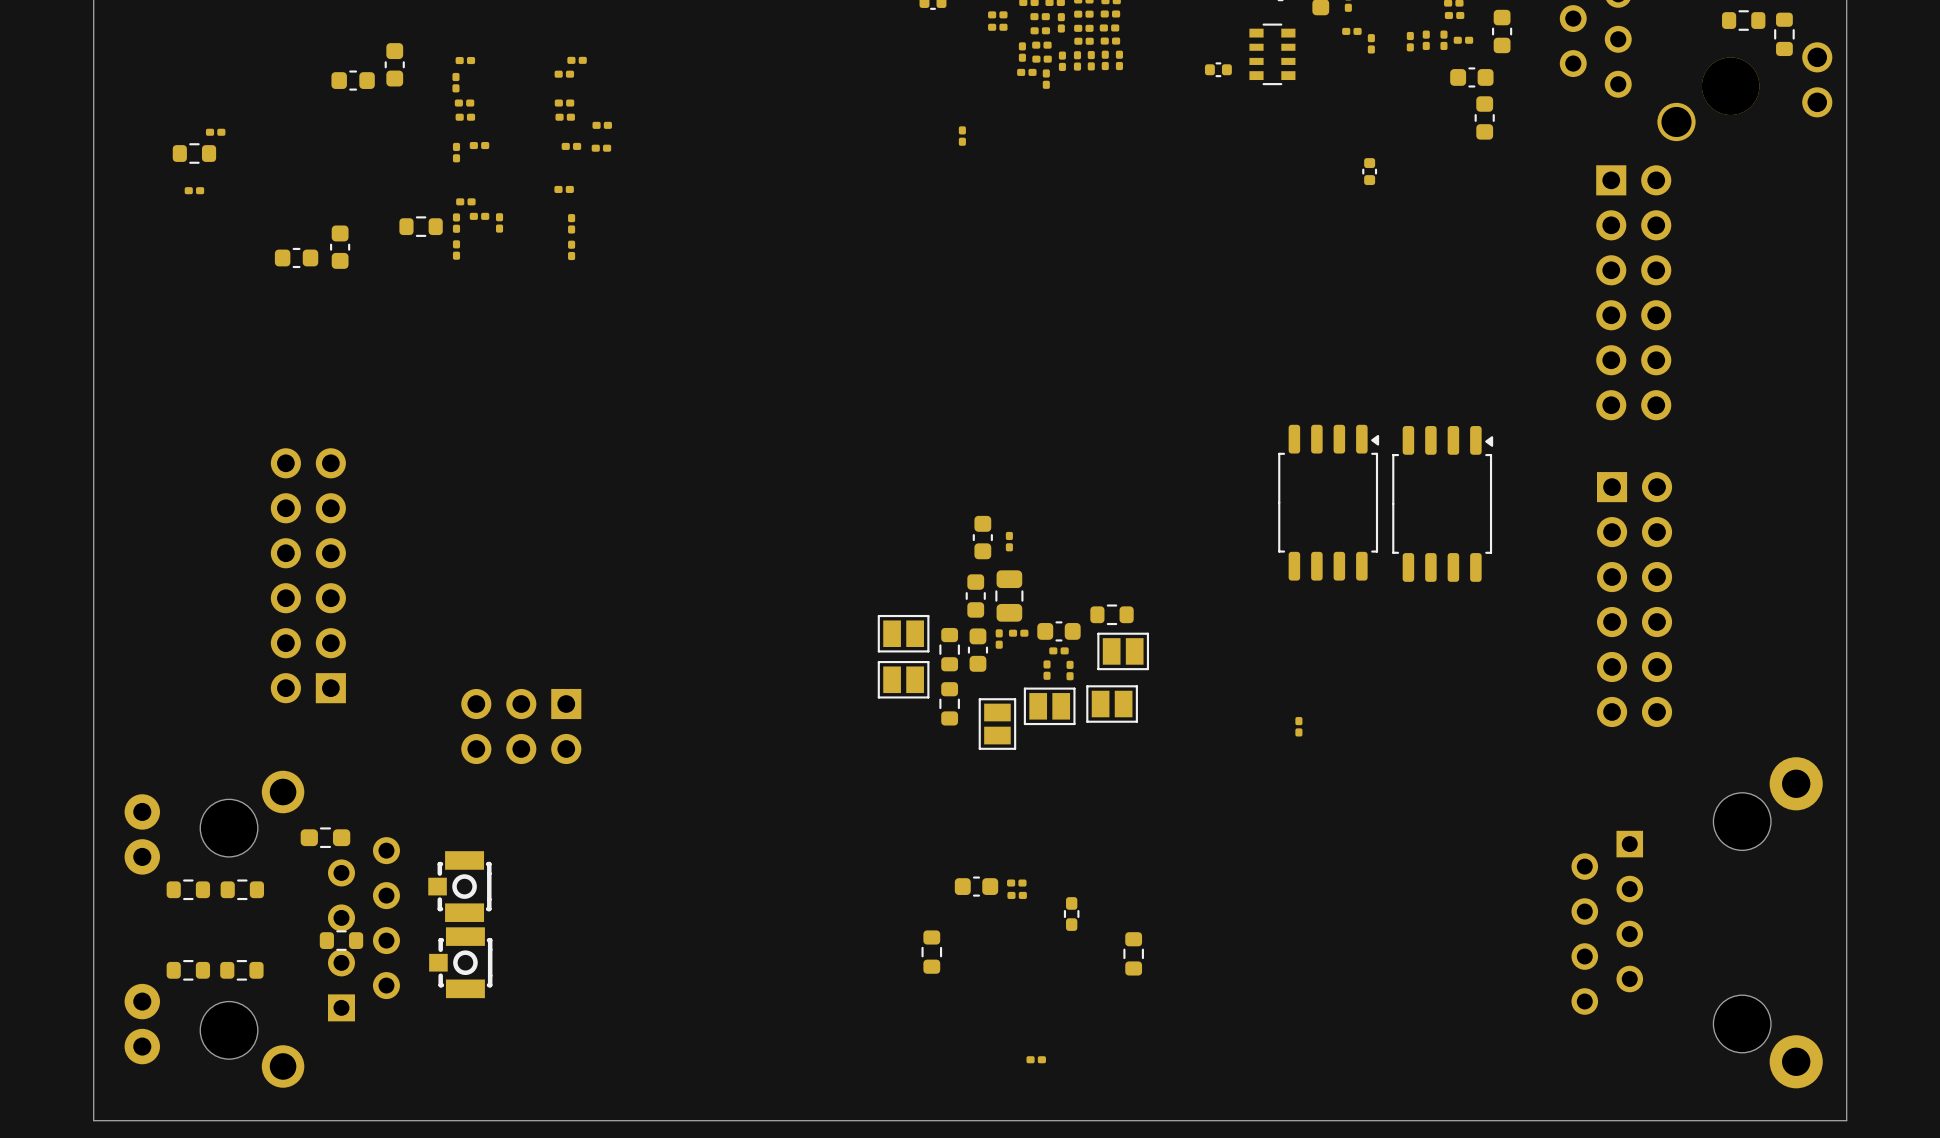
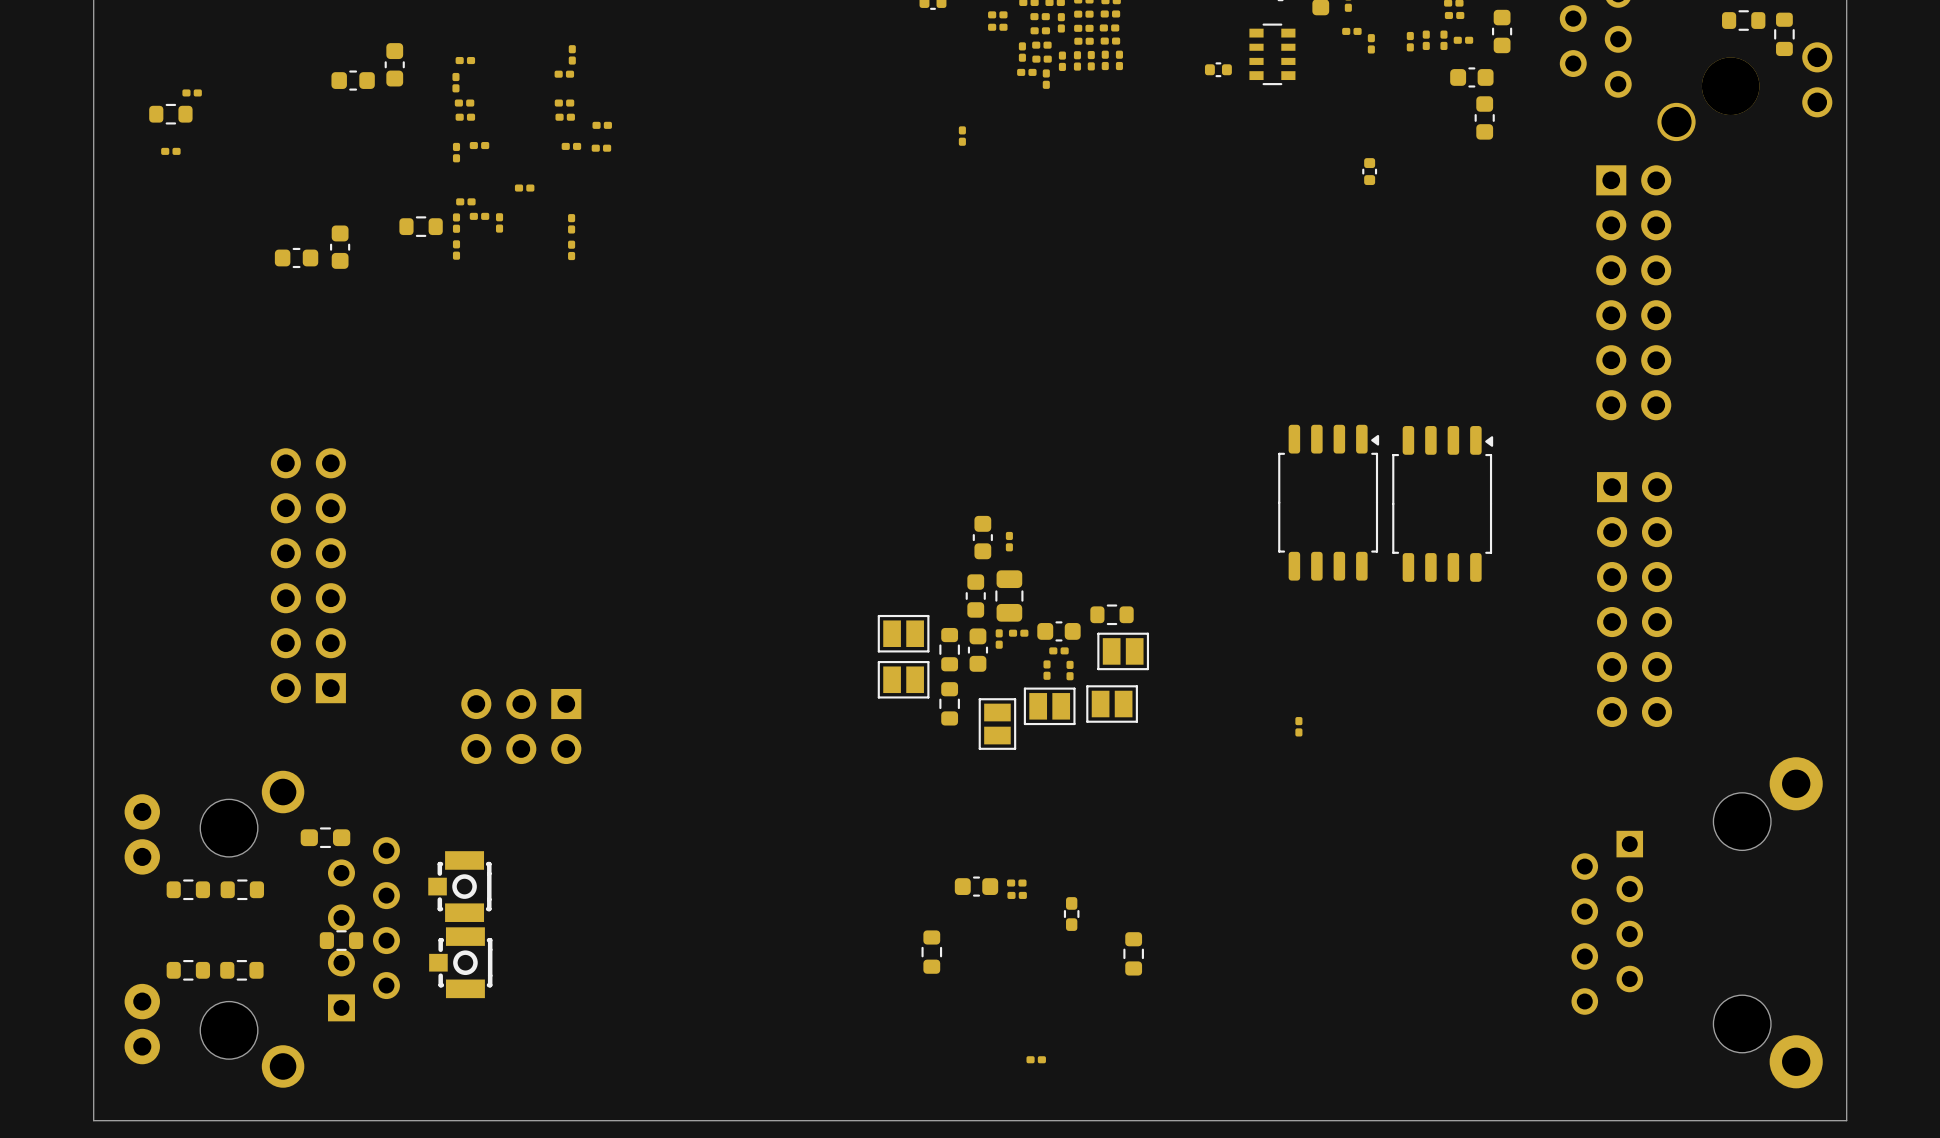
part rotation: 0° (577, 60) -> 90° clockwise (572, 54)
part: none -> (192, 92)
part: (215, 132) -> none
part: none -> (170, 151)
part position: (194, 153) -> (170, 114)
part position: (564, 189) -> (524, 188)
part: (194, 190) -> none

